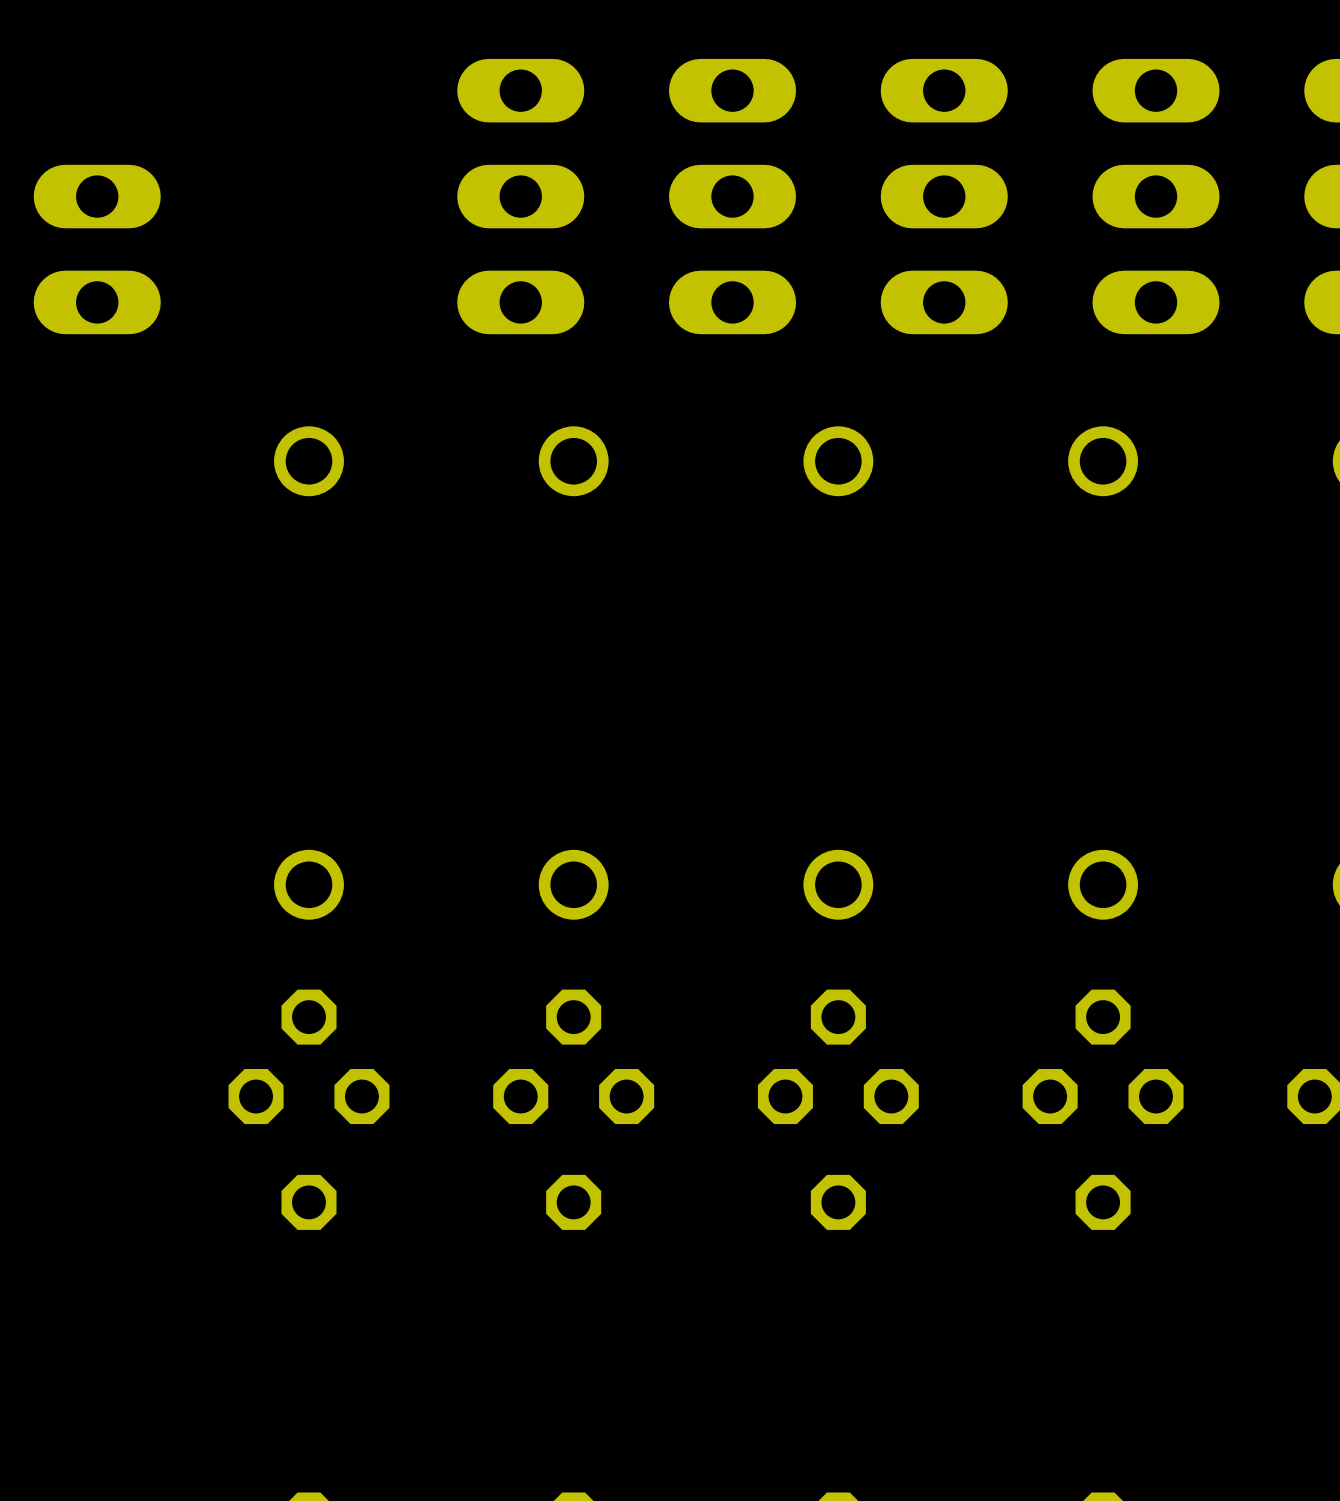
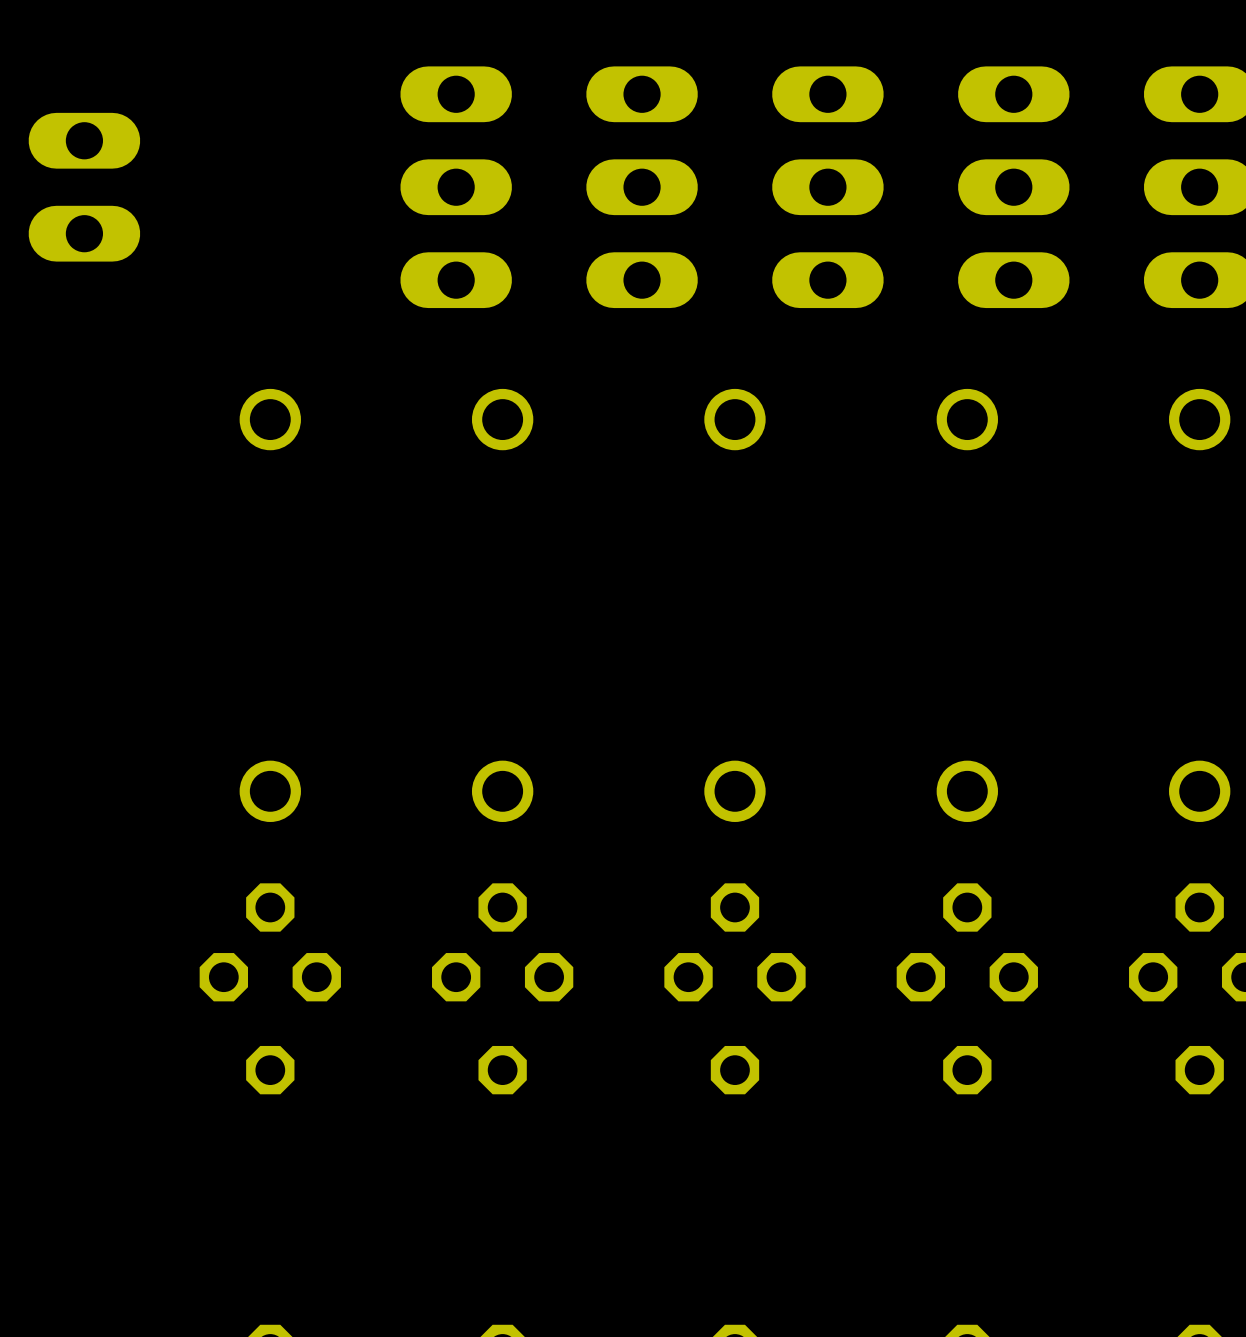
part position: (97, 249) -> (84, 187)

